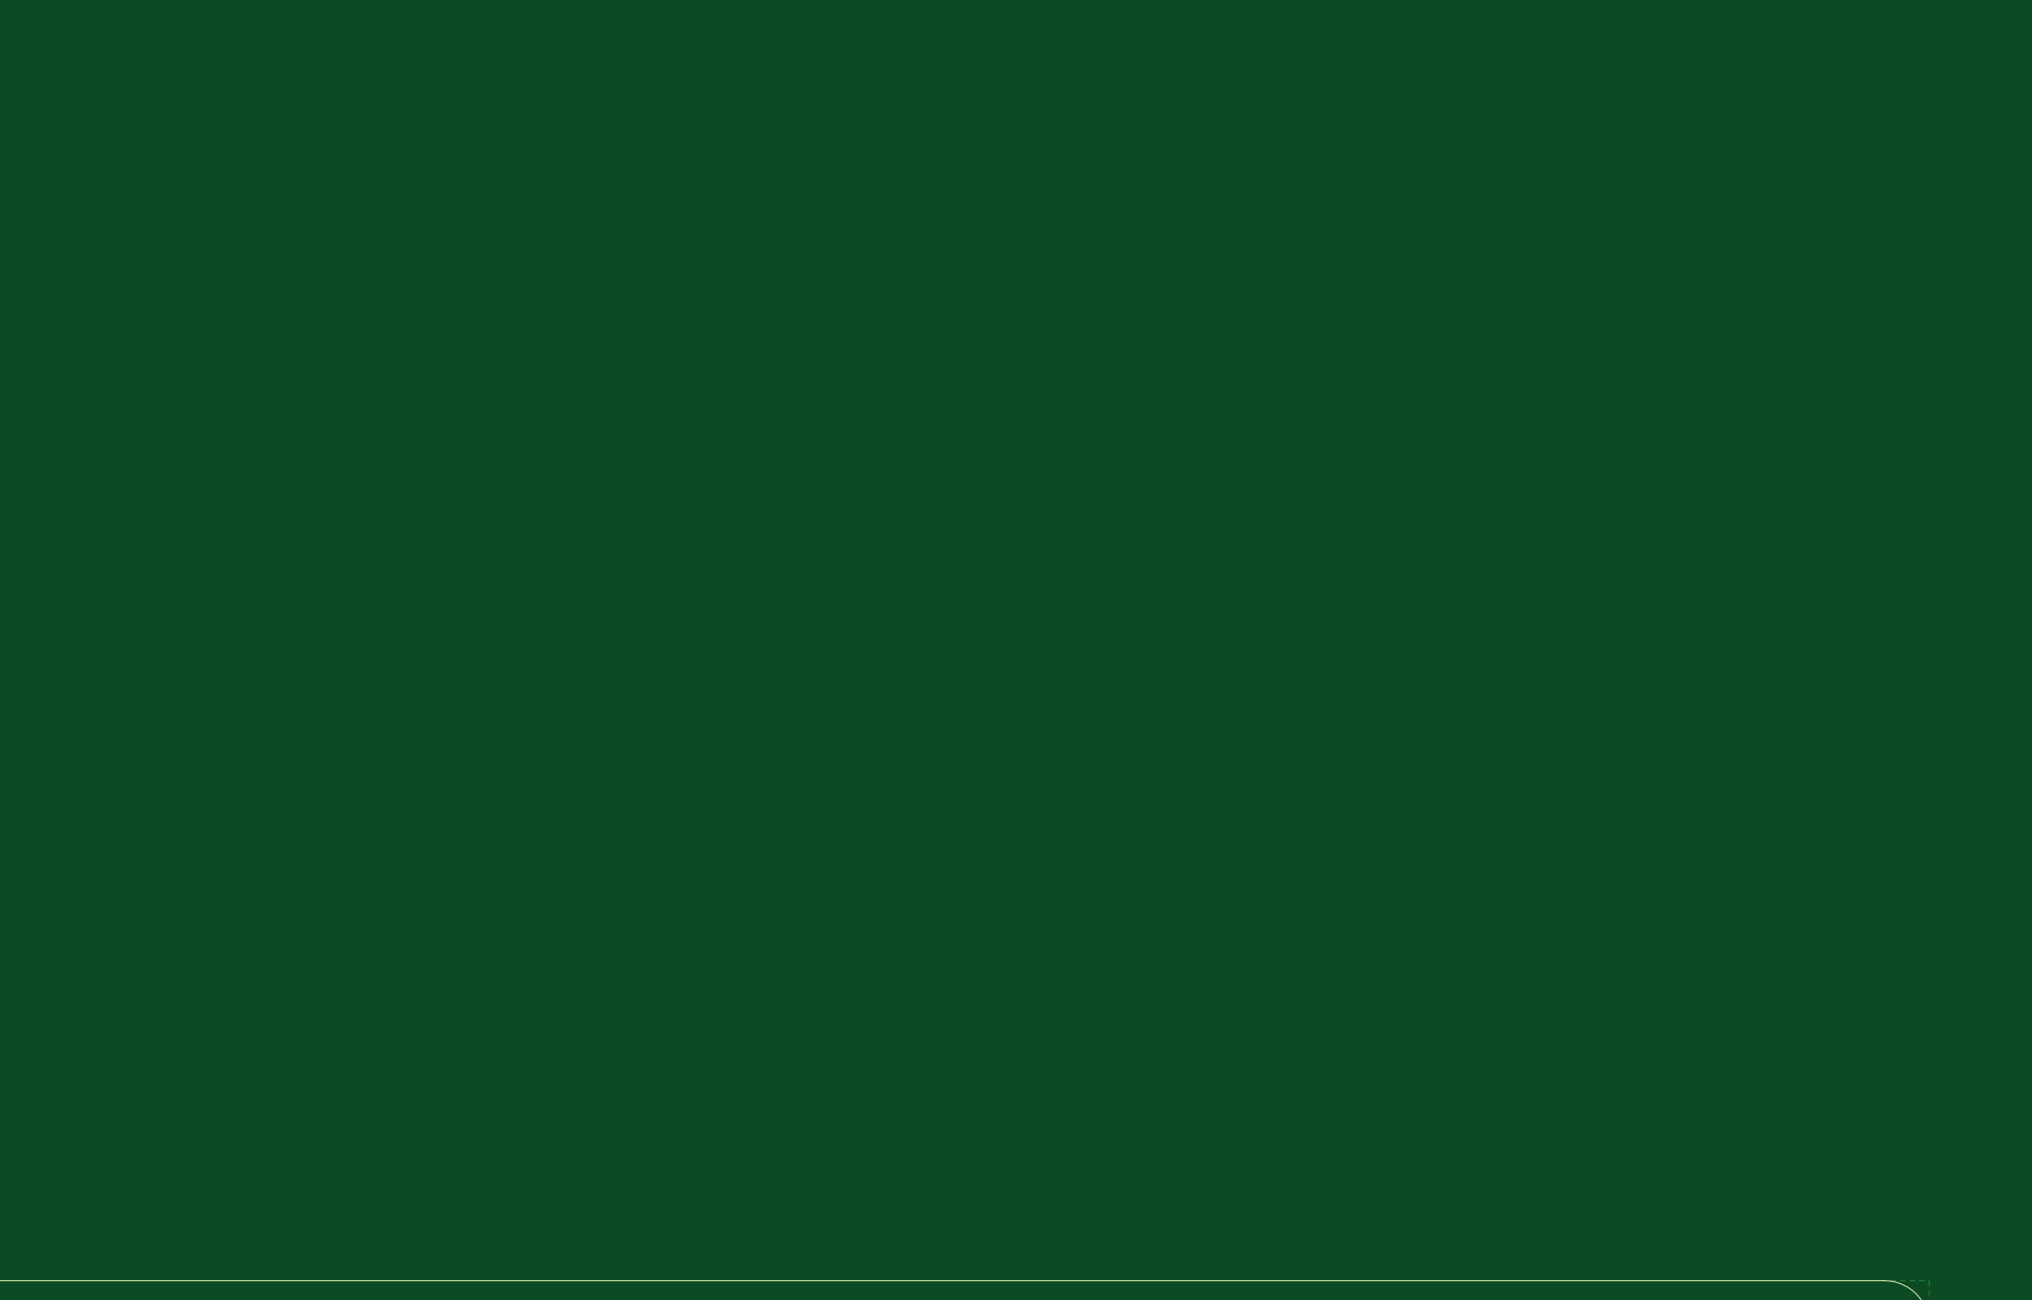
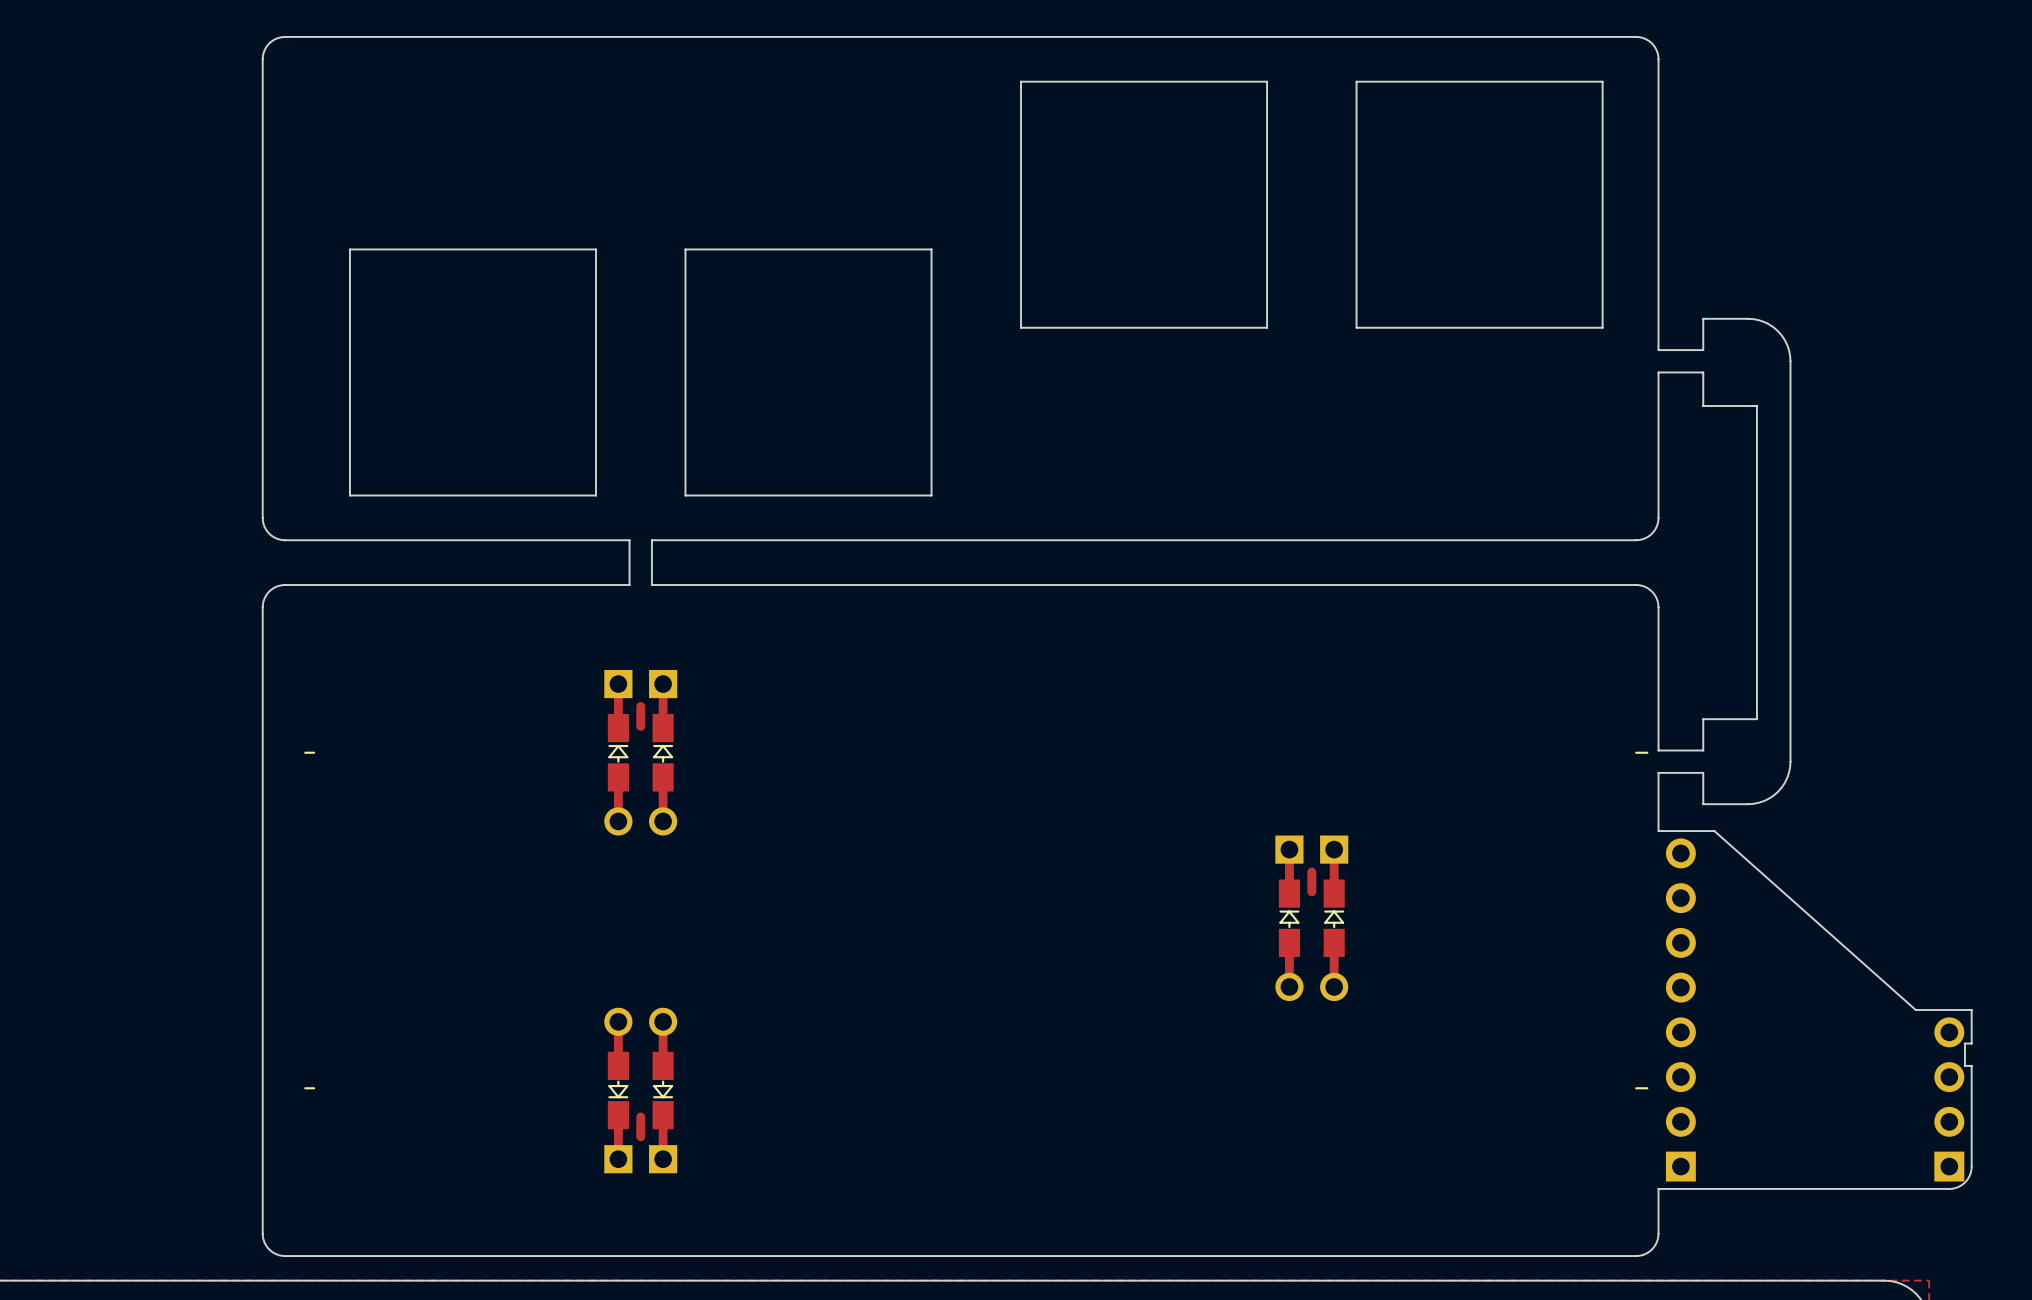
board edge: none -> (285, 36) (1636, 36) (1649, 41) (1655, 48) (1658, 59) (1658, 350) (1703, 350) (1703, 318) (1753, 319) (1769, 324) (1781, 335) (1789, 350) (1790, 361) (1789, 772) (1781, 787) (1773, 795) (1764, 800) (1748, 804) (1703, 804) (1703, 772) (1658, 772) (1658, 831) (1714, 831) (1915, 1009) (1971, 1009) (1971, 1043) (1964, 1043) (1964, 1065) (1971, 1065) (1971, 1166) (1967, 1180) (1960, 1185) (1949, 1188) (1658, 1188) (1657, 1239) (1649, 1251) (1636, 1256) (285, 1256) (271, 1251) (265, 1244) (262, 1233) (262, 607) (265, 596) (273, 587) (285, 584) (629, 584) (629, 540) (285, 540) (273, 537) (265, 529) (262, 517) (262, 59) (264, 50) (269, 43) (276, 38) (285, 36)
board edge: none -> (1021, 81) (1021, 327) (1267, 327) (1267, 81) (1021, 81)
board edge: none -> (1356, 81) (1602, 81) (1602, 327) (1356, 327) (1356, 81)
board edge: none -> (349, 249) (349, 495) (596, 495) (596, 249) (349, 249)
board edge: none -> (685, 249) (685, 495) (931, 495) (931, 249) (685, 249)
board edge: none -> (1658, 372) (1658, 520) (1651, 533) (1641, 539) (651, 540) (651, 584) (1639, 585) (1651, 591) (1658, 604) (1658, 750) (1703, 750) (1703, 719) (1756, 719) (1756, 406) (1703, 406) (1703, 372) (1658, 372)
track: none -> (640, 706) (640, 726)
line: none -> (305, 752) (314, 752)
part: none -> (618, 752)
part: none -> (663, 752)
line: none -> (1636, 752) (1647, 752)
track: none -> (1311, 871) (1311, 891)
part: none -> (1289, 918)
part: none -> (1334, 918)
part: none -> (1680, 1009)
line: none -> (305, 1088) (314, 1088)
line: none -> (1636, 1088) (1647, 1088)
part: none -> (618, 1090)
part: none -> (663, 1090)
part: none -> (1949, 1099)
track: none -> (640, 1116) (640, 1136)

